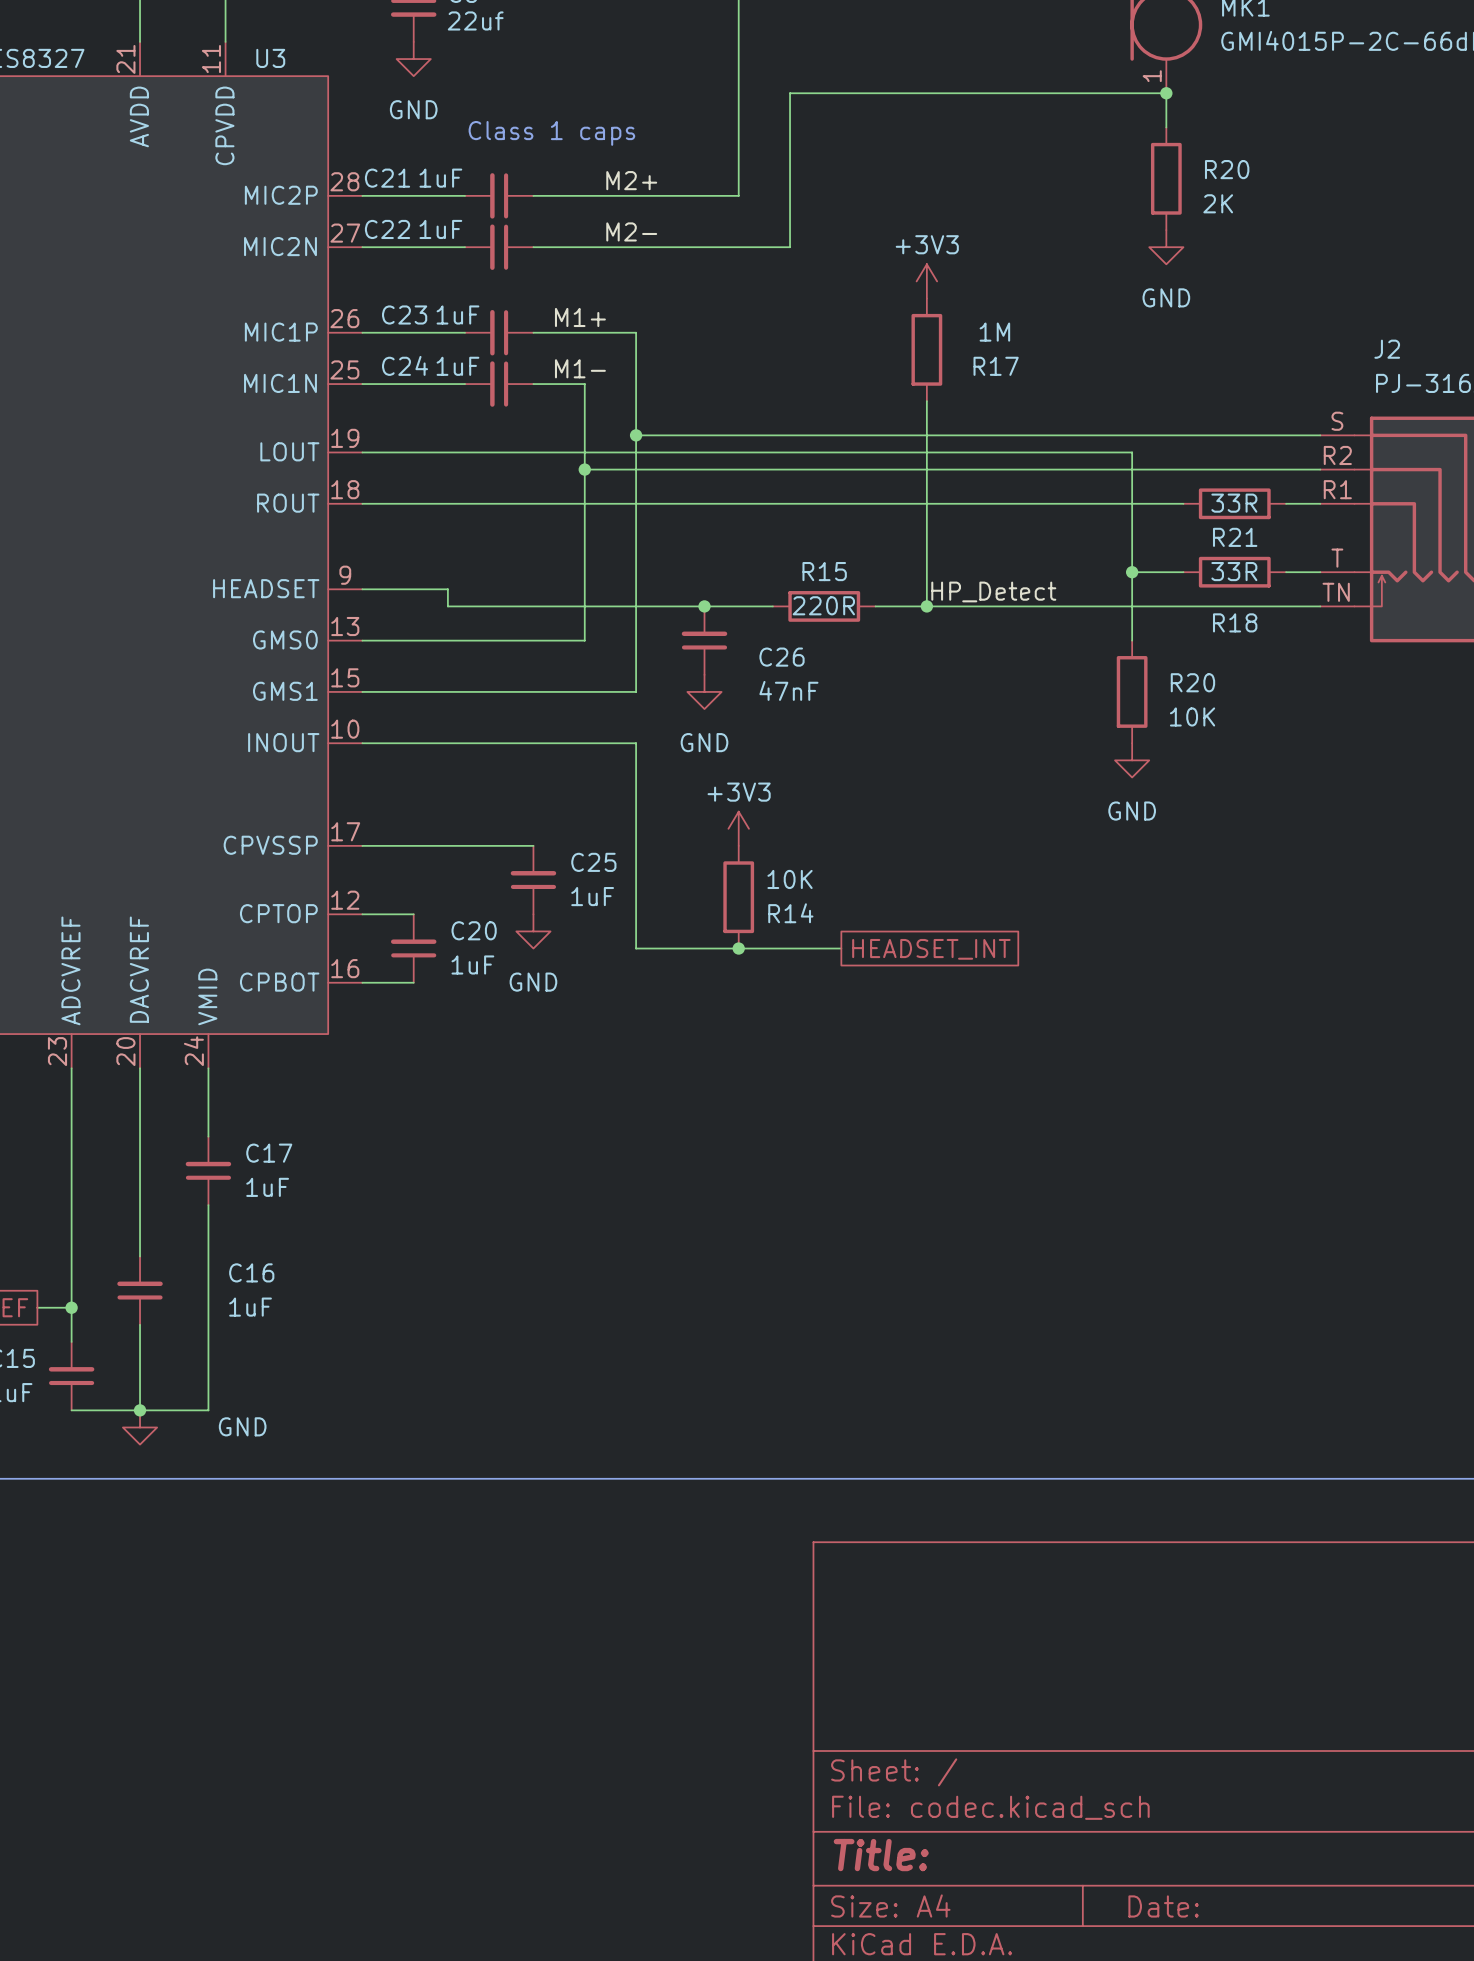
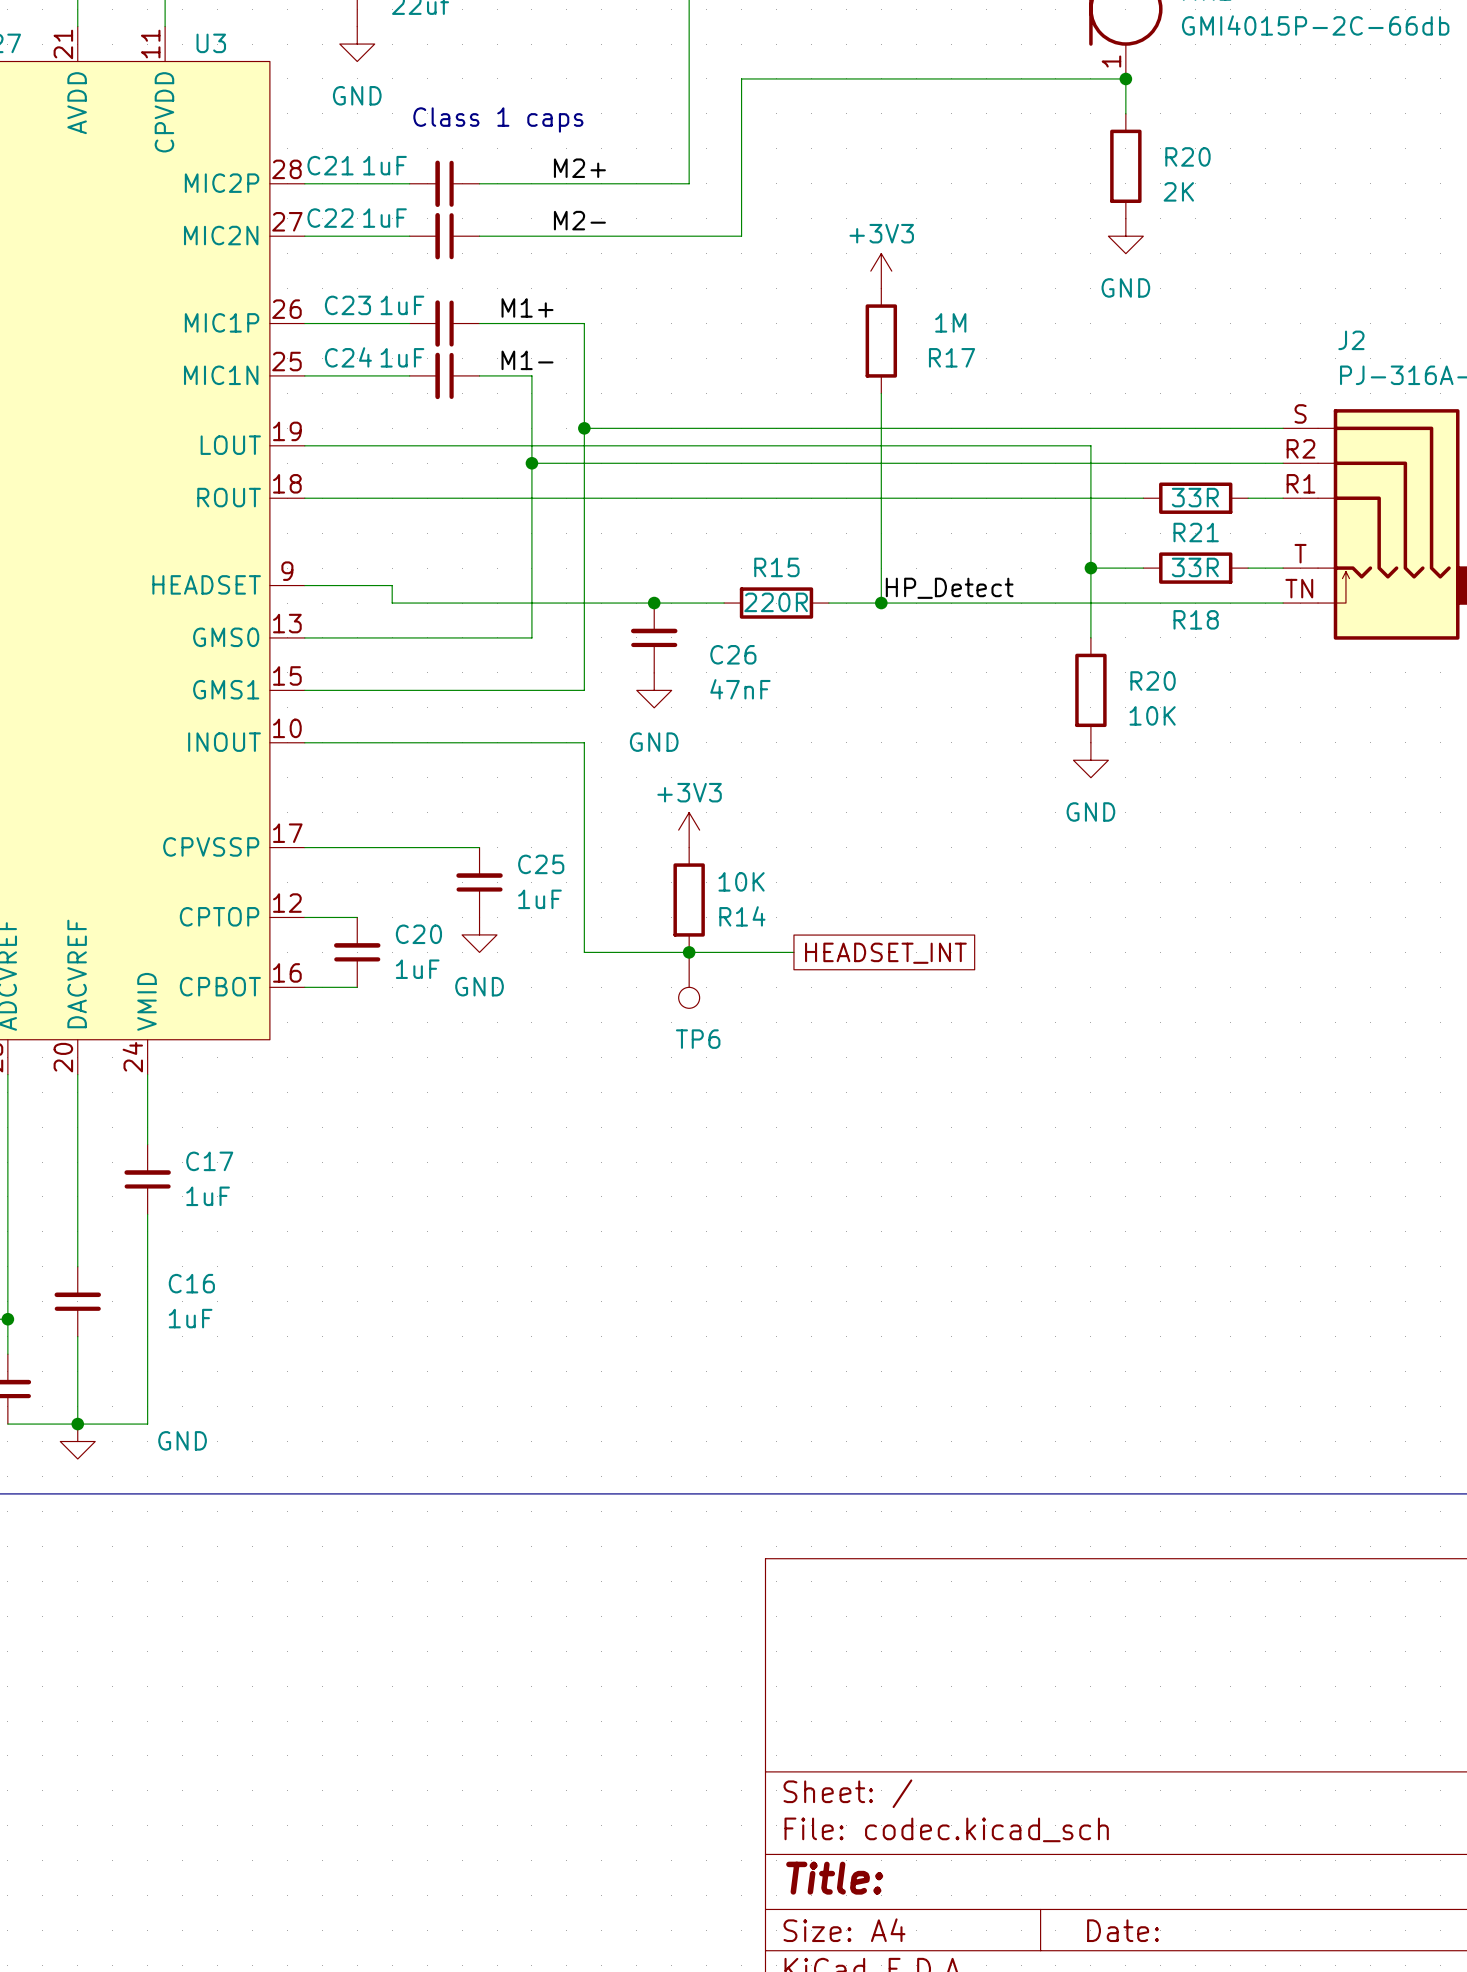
TP6: none -> (689, 980)

